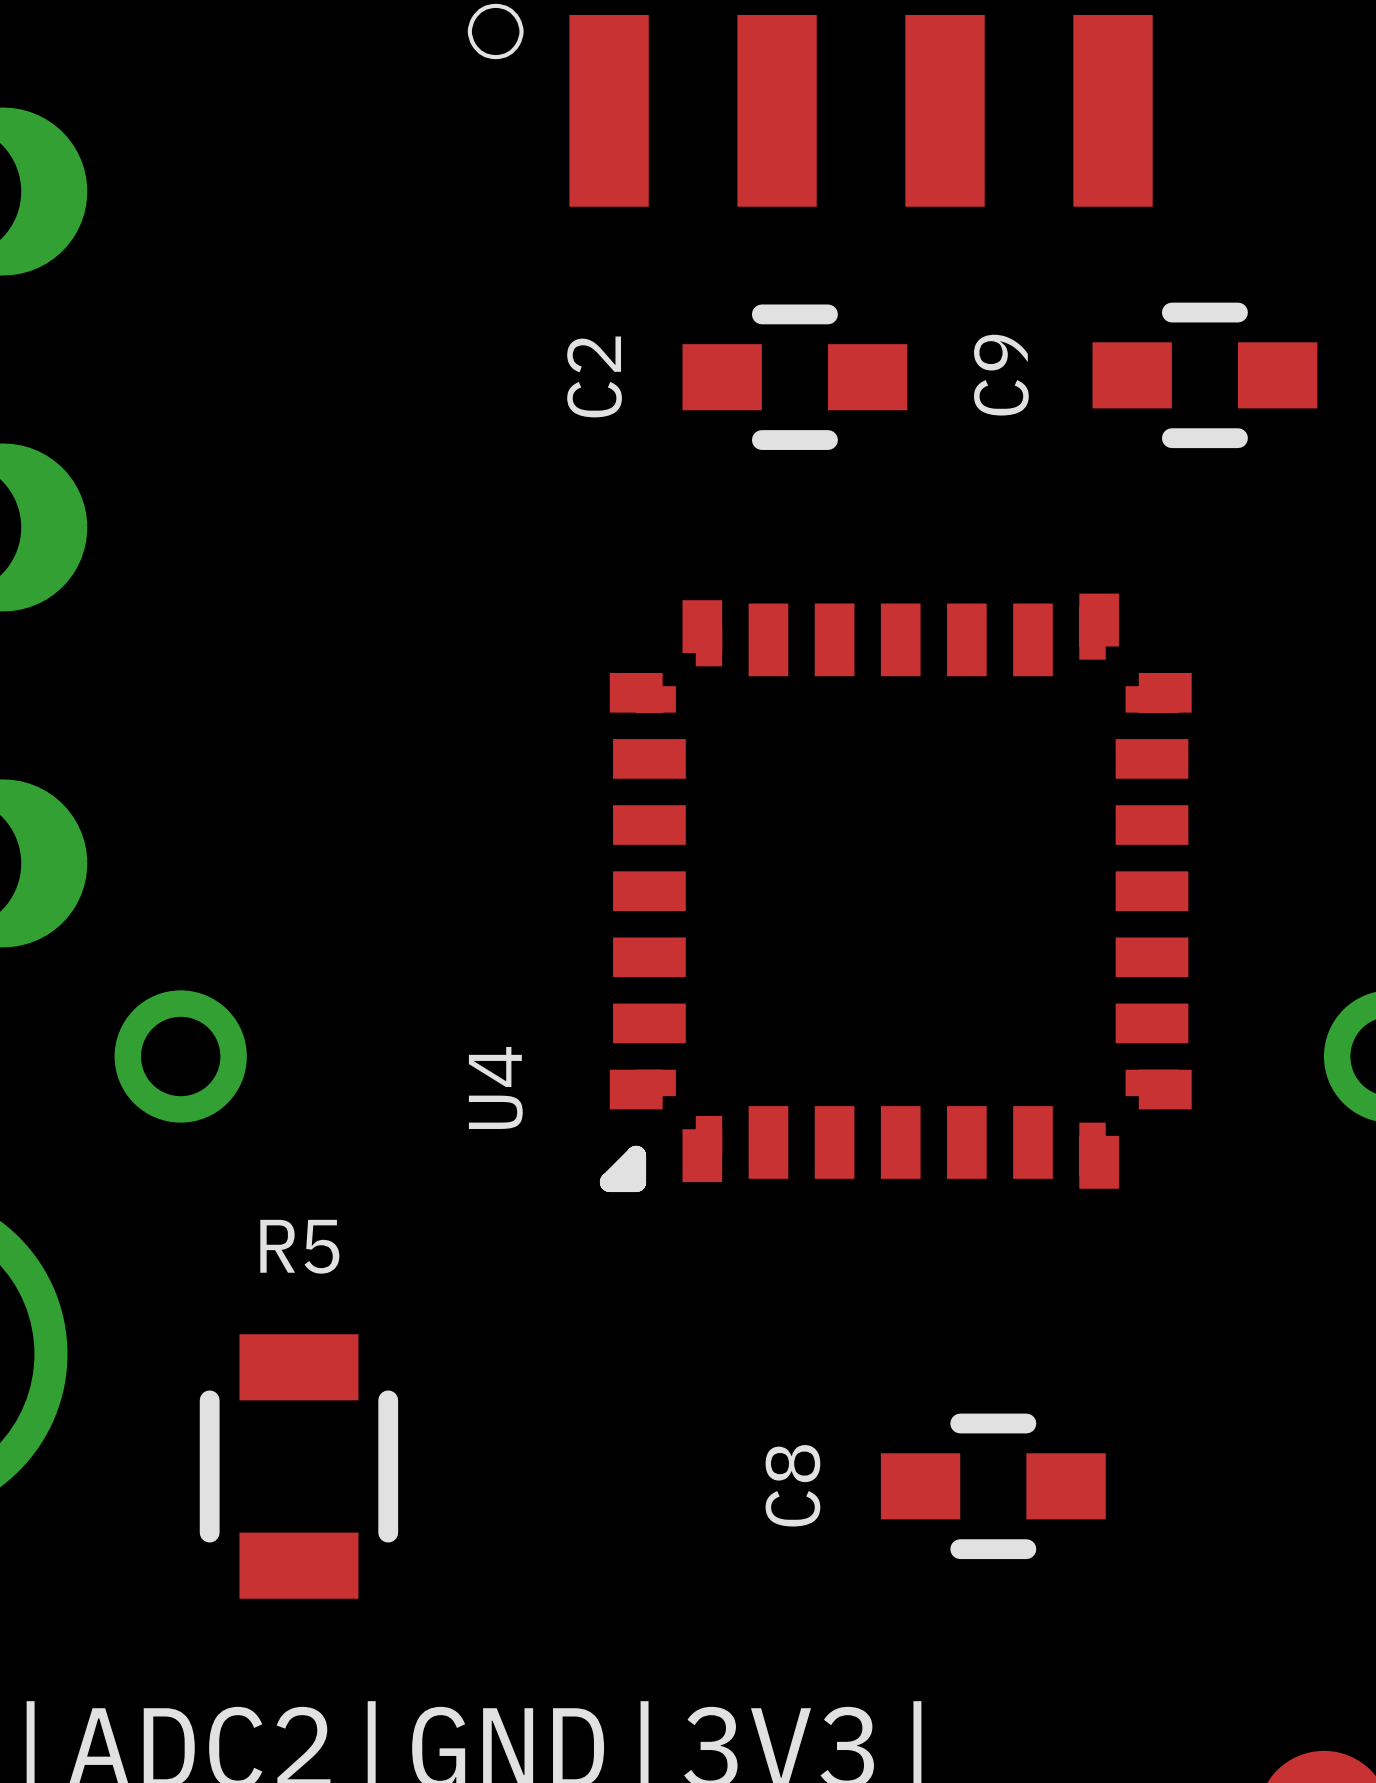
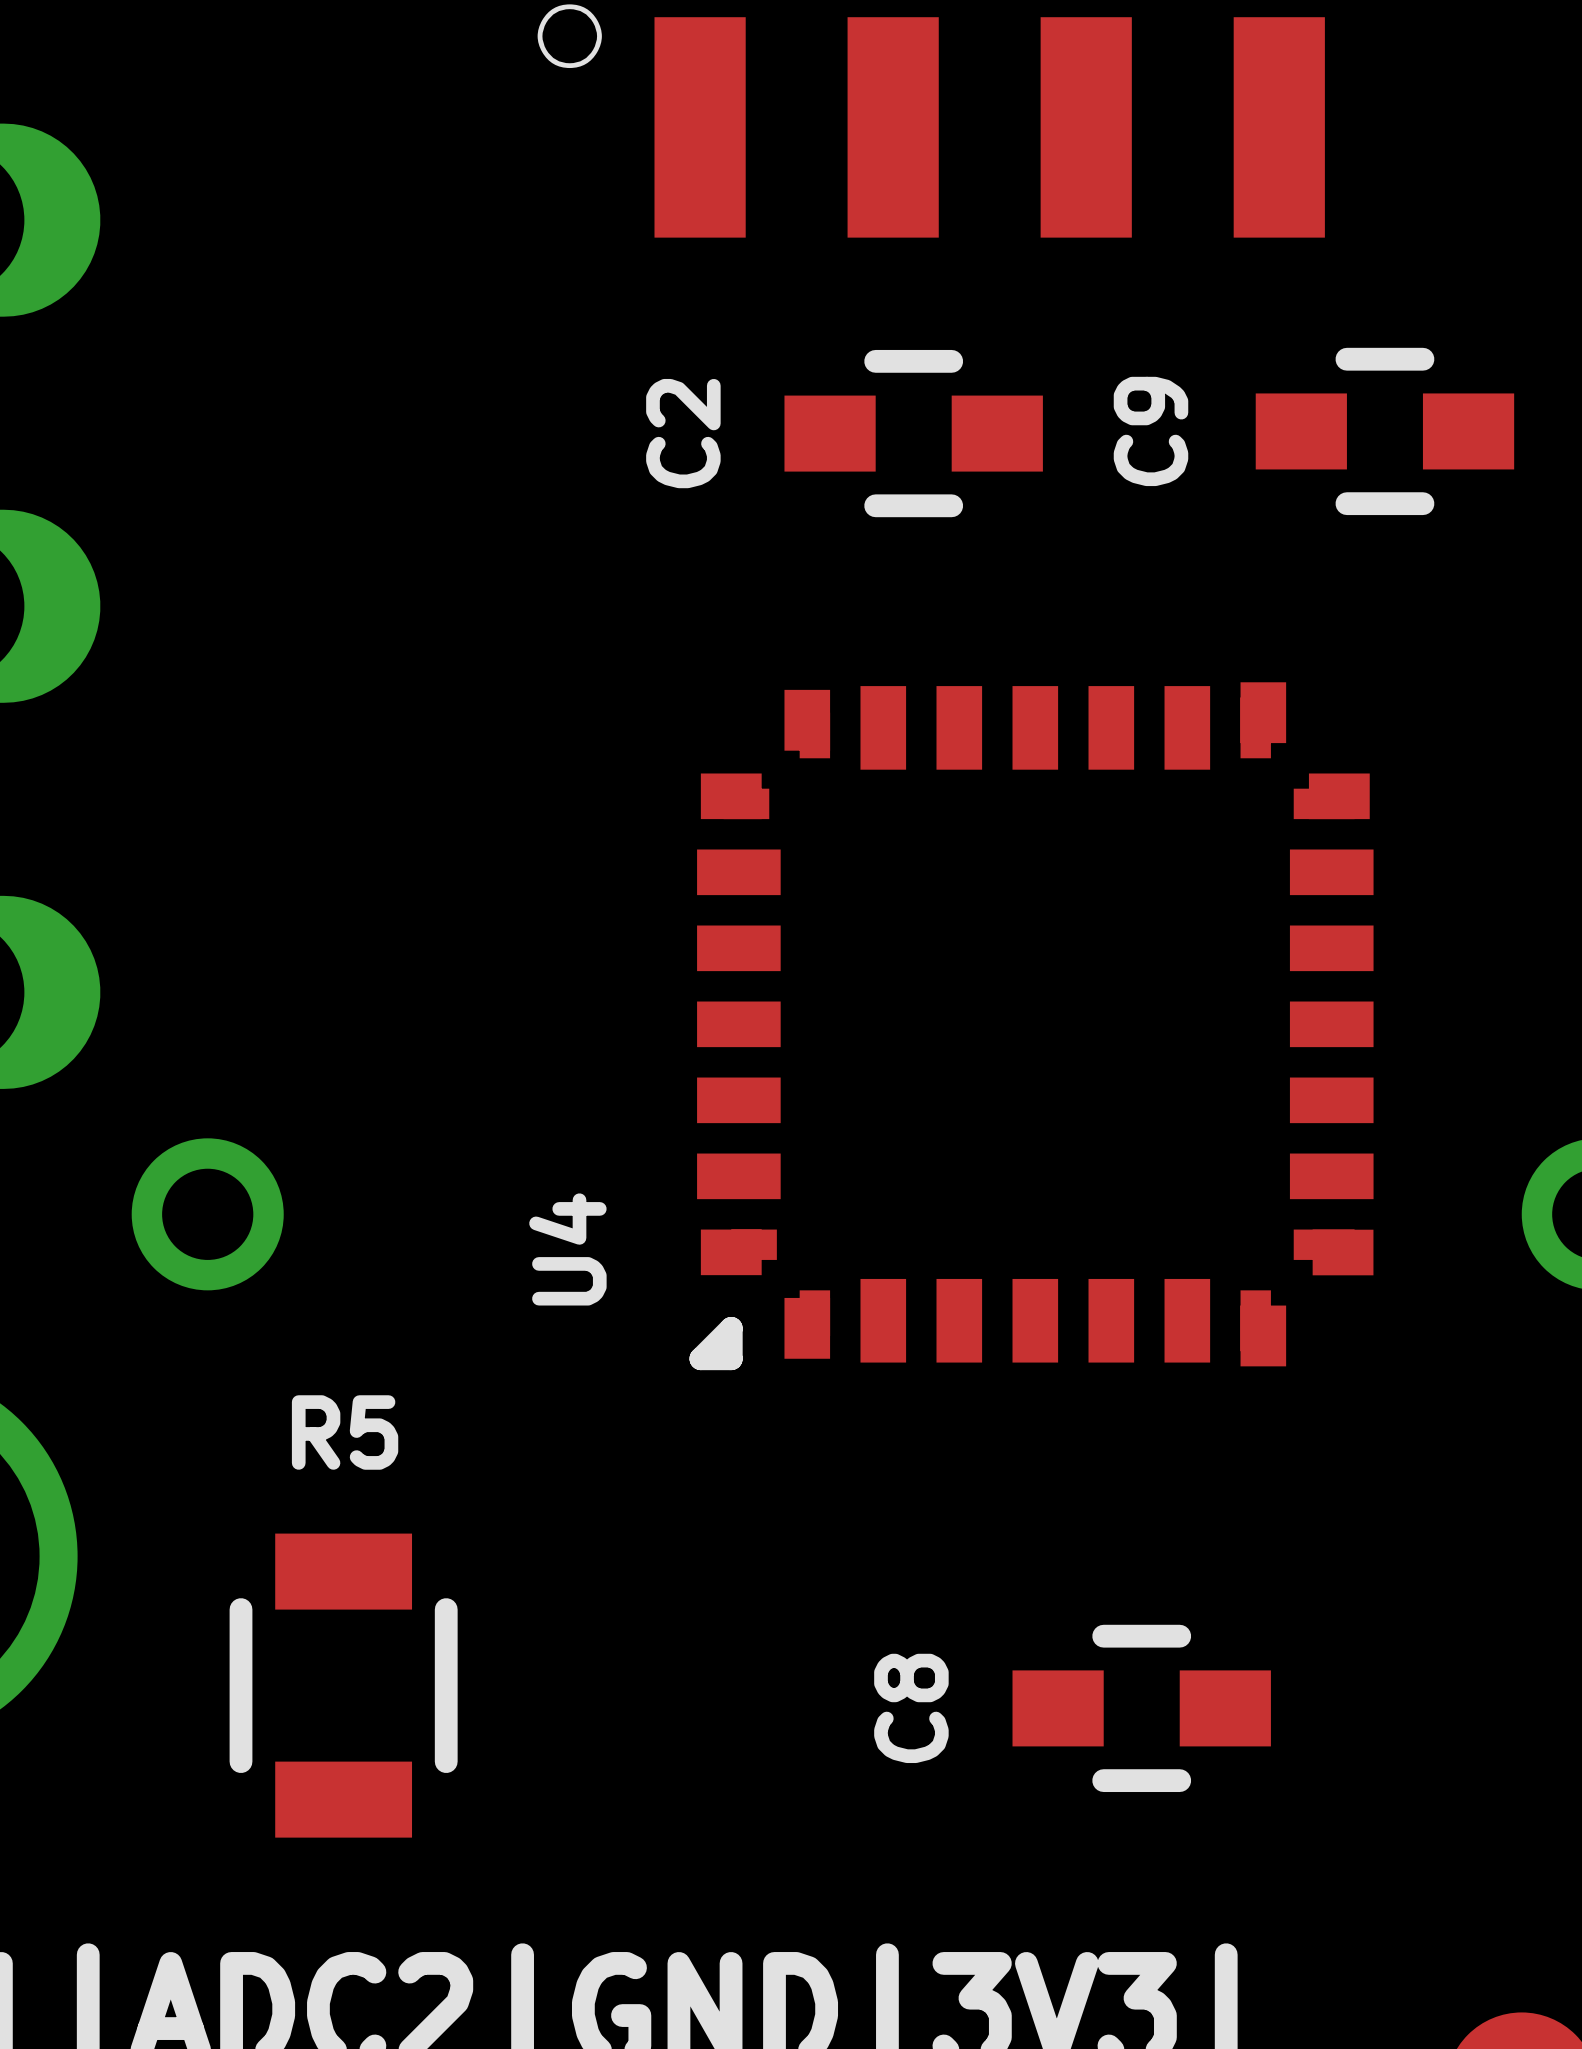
U4 footprint: [599, 593, 1192, 1193] -> [689, 682, 1374, 1371]

